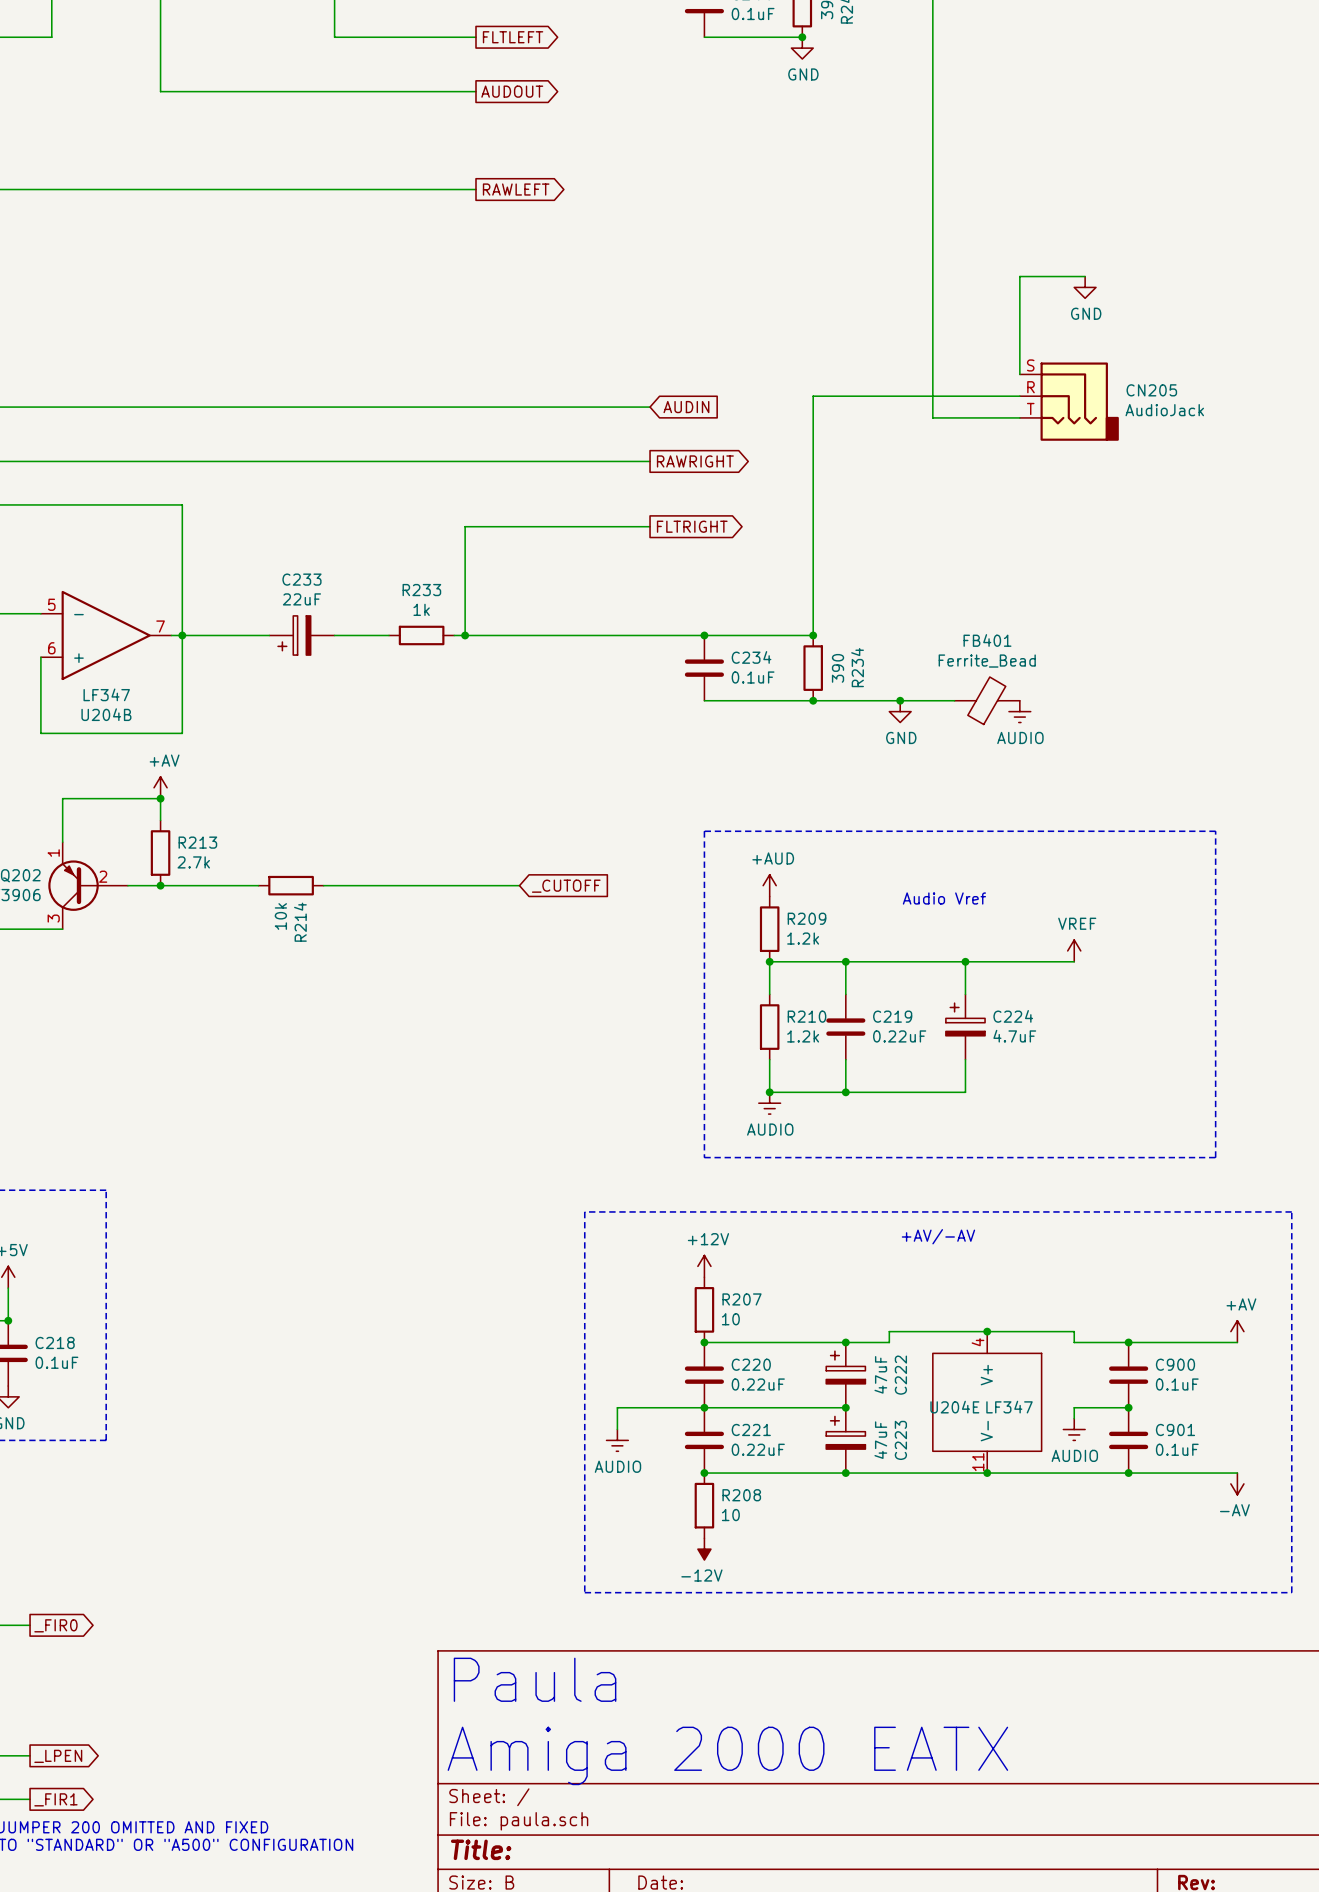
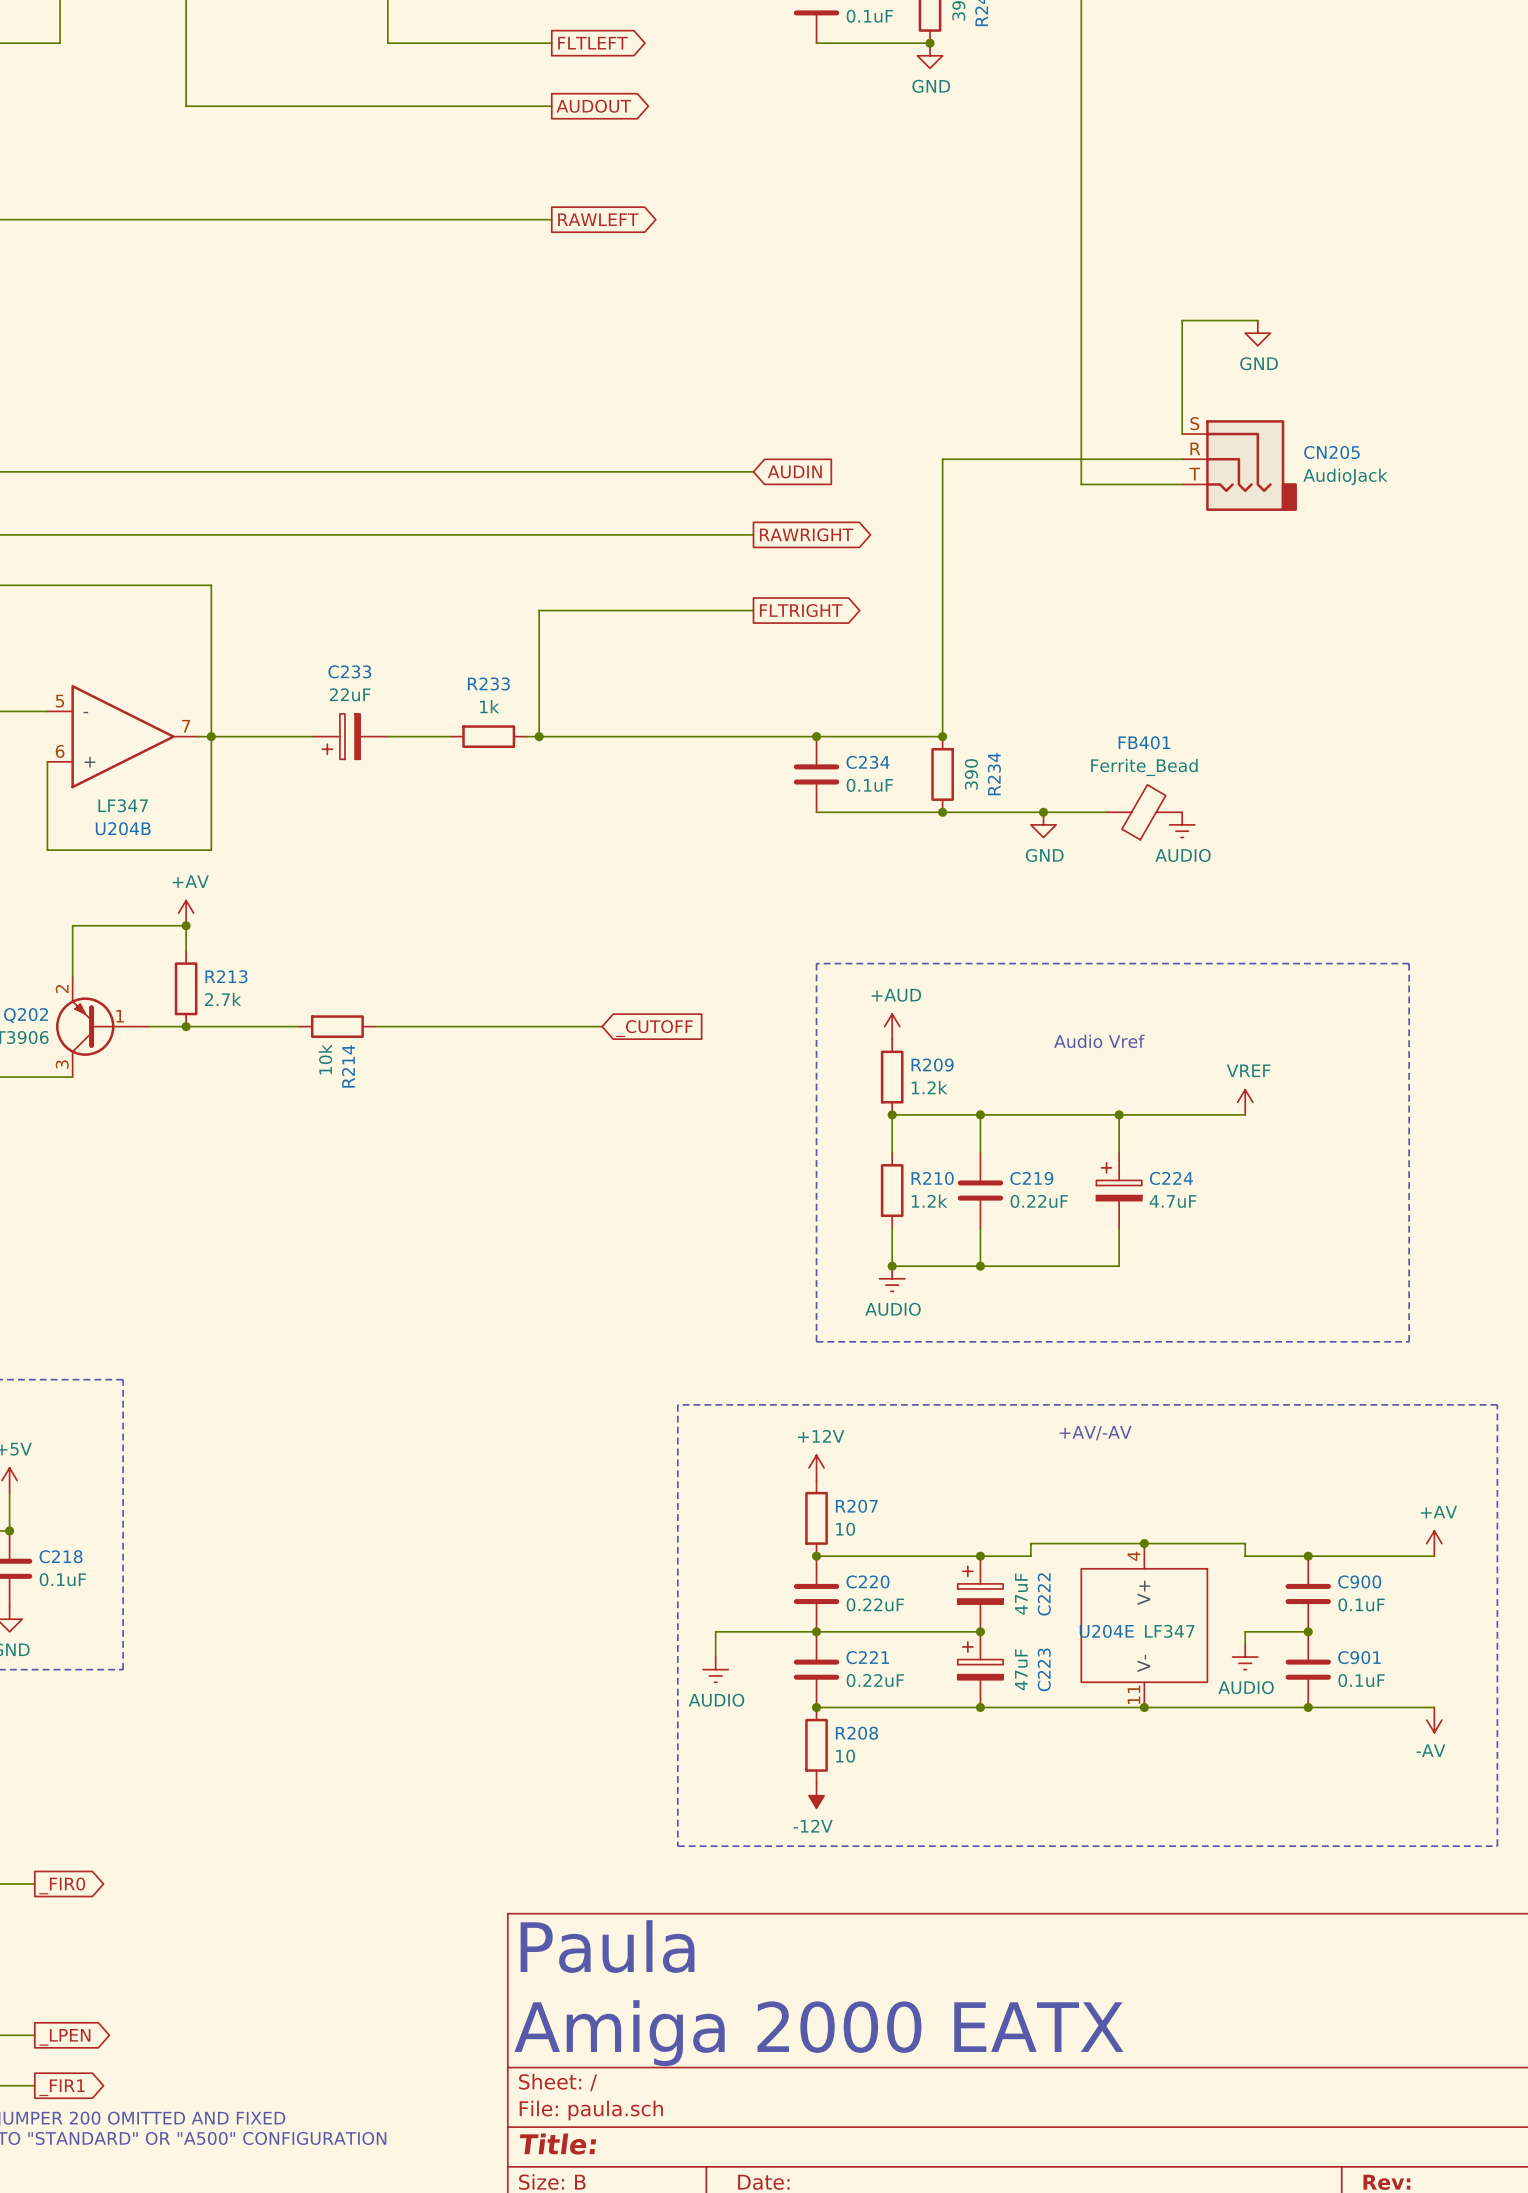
Q202 pin number: 1 (53, 853) -> 2 (62, 989)
Q202 pin number: 2 (103, 876) -> 1 (120, 1016)

